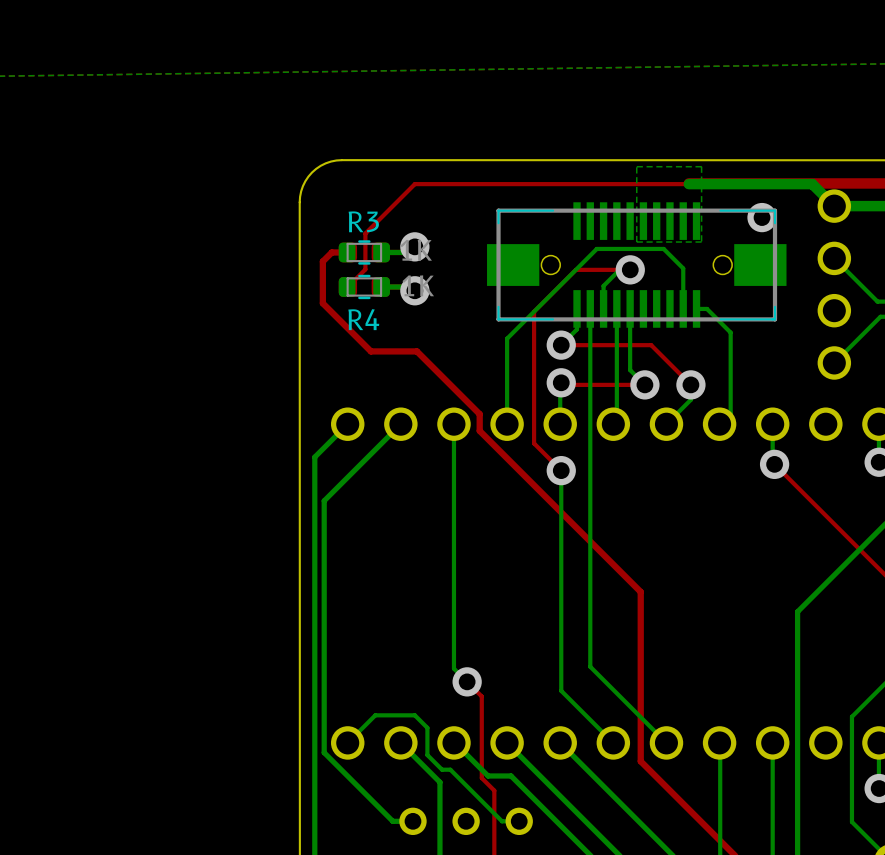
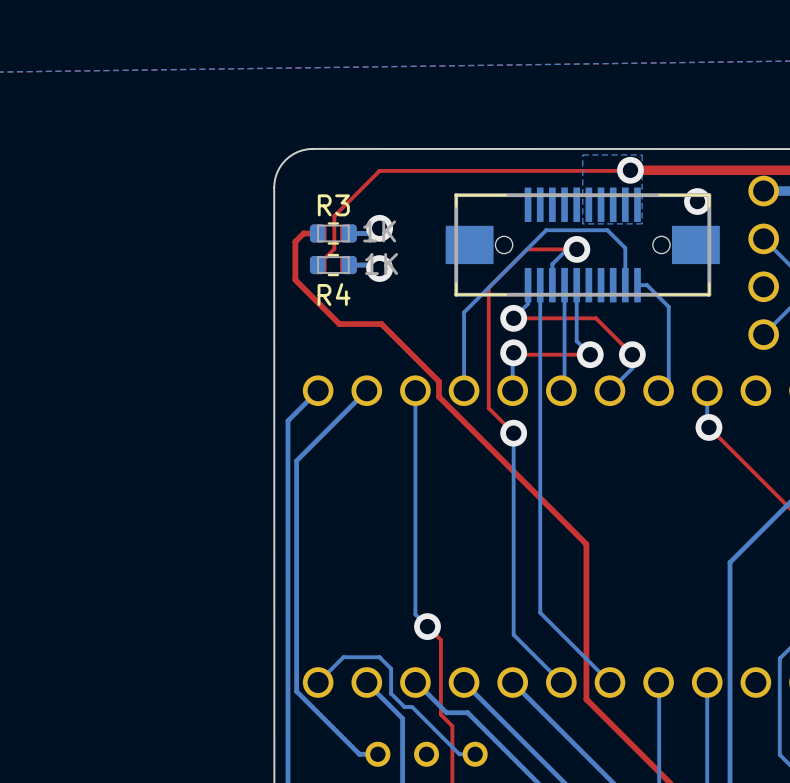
via: none -> (630, 170)
bottom track: (688, 184) (812, 184) (834, 206) -> none

